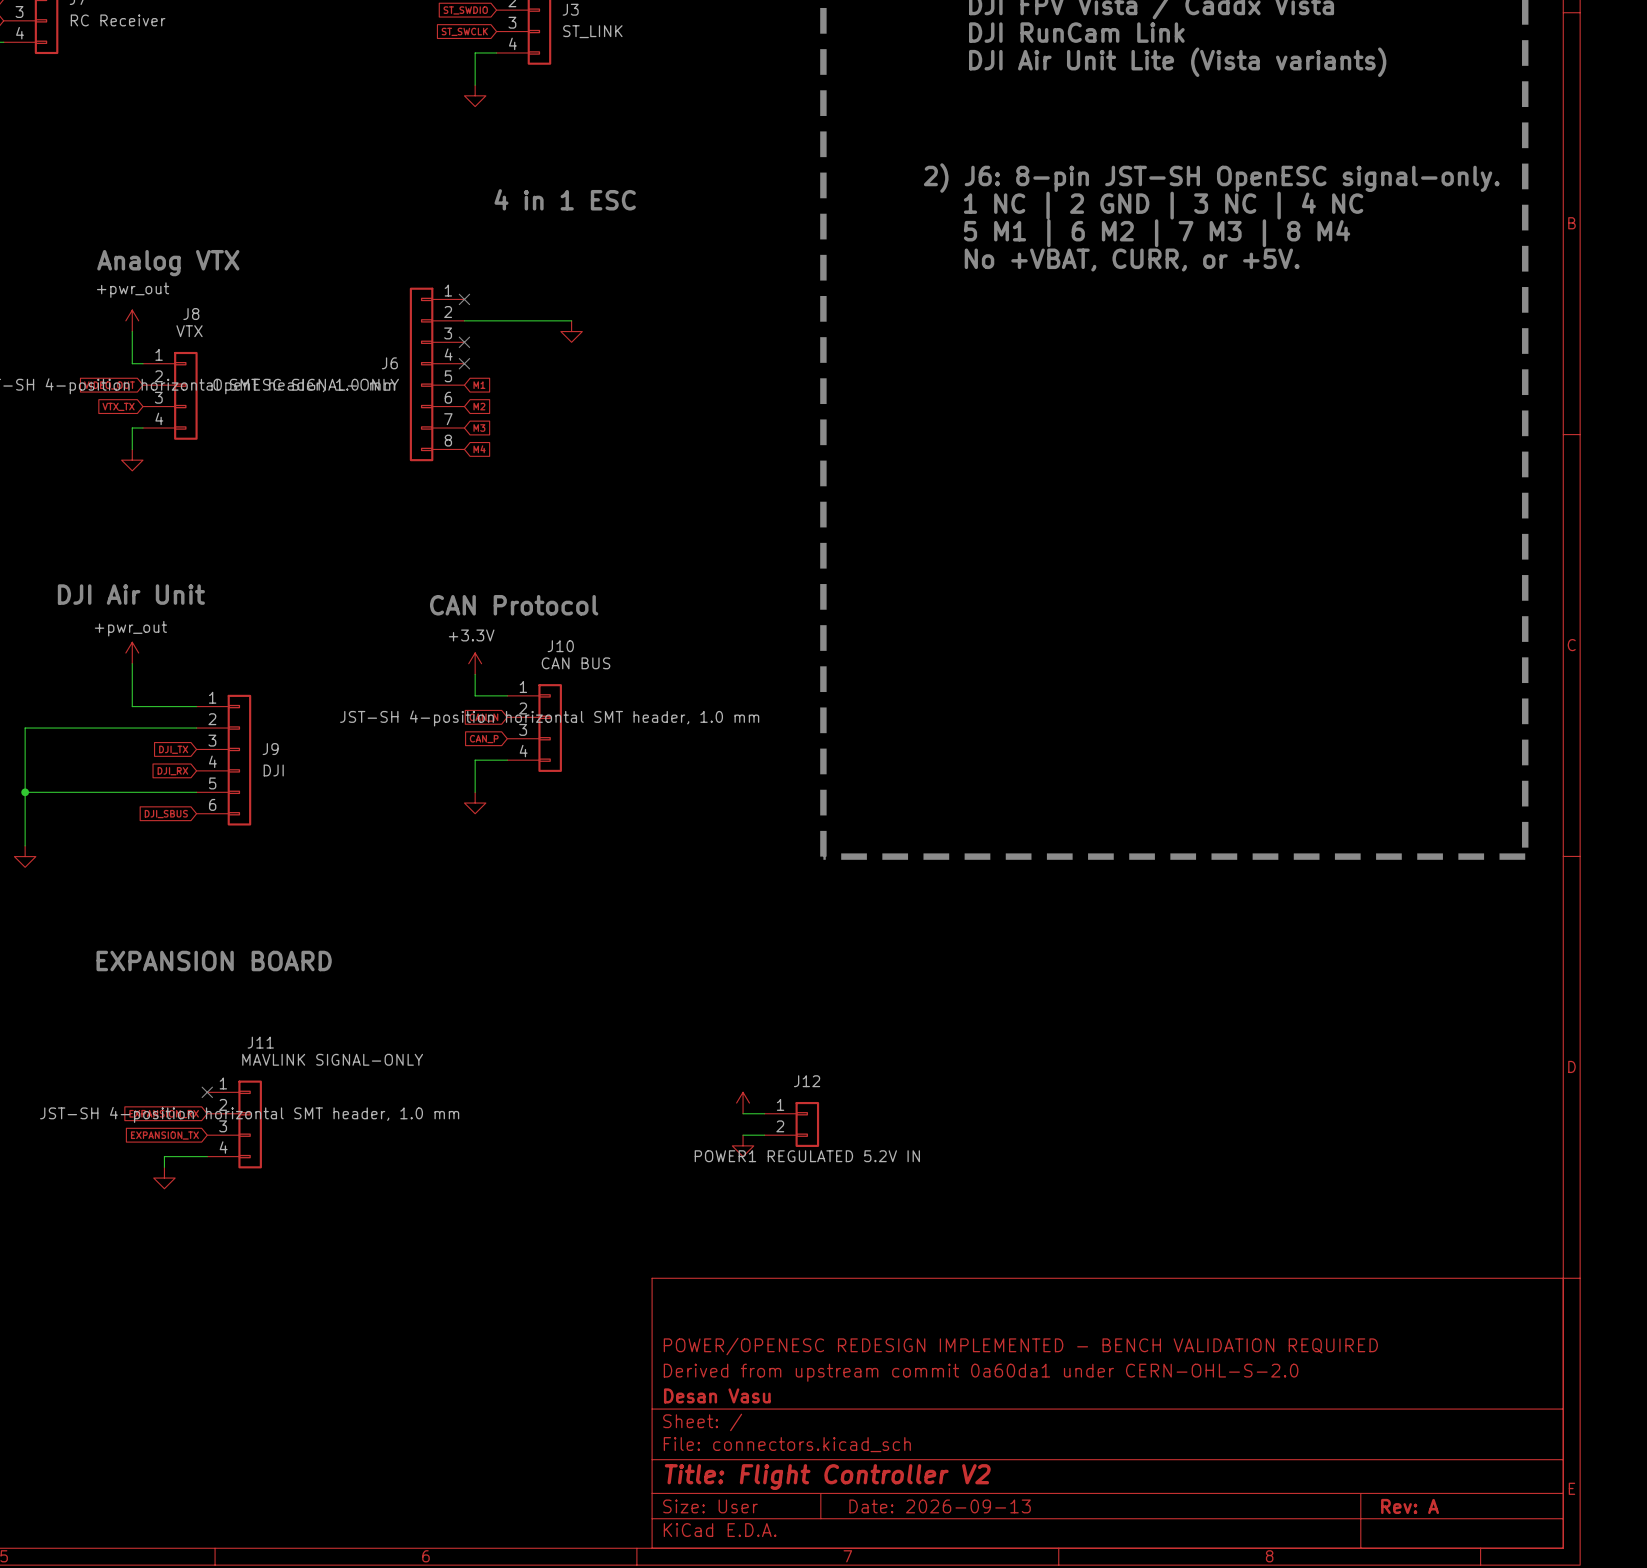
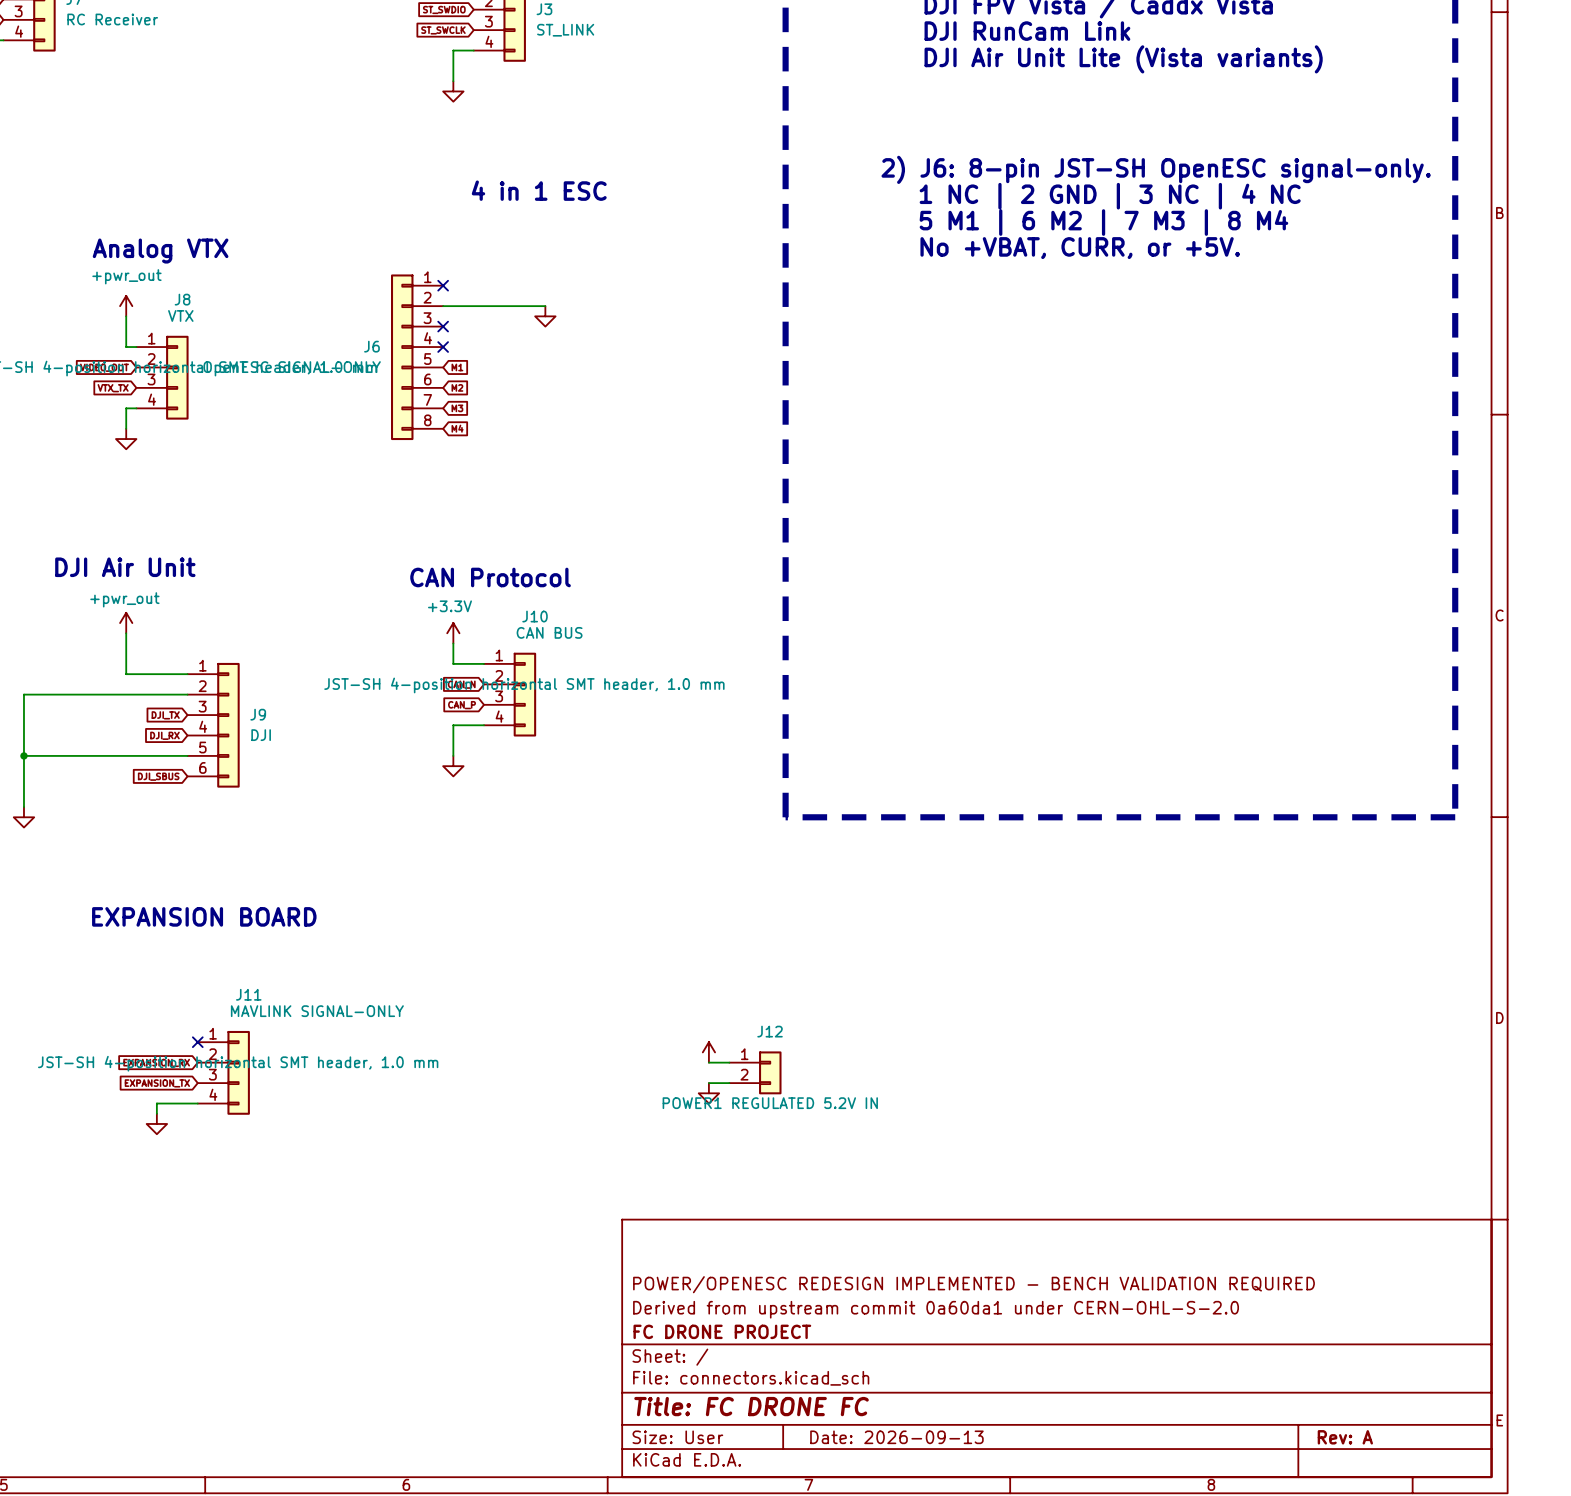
title block: Desan Vasu (717, 1395) -> FC DRONE PROJECT (722, 1331)
title block: Title: Flight Controller V2 (827, 1477) -> Title: FC DRONE FC (751, 1406)

